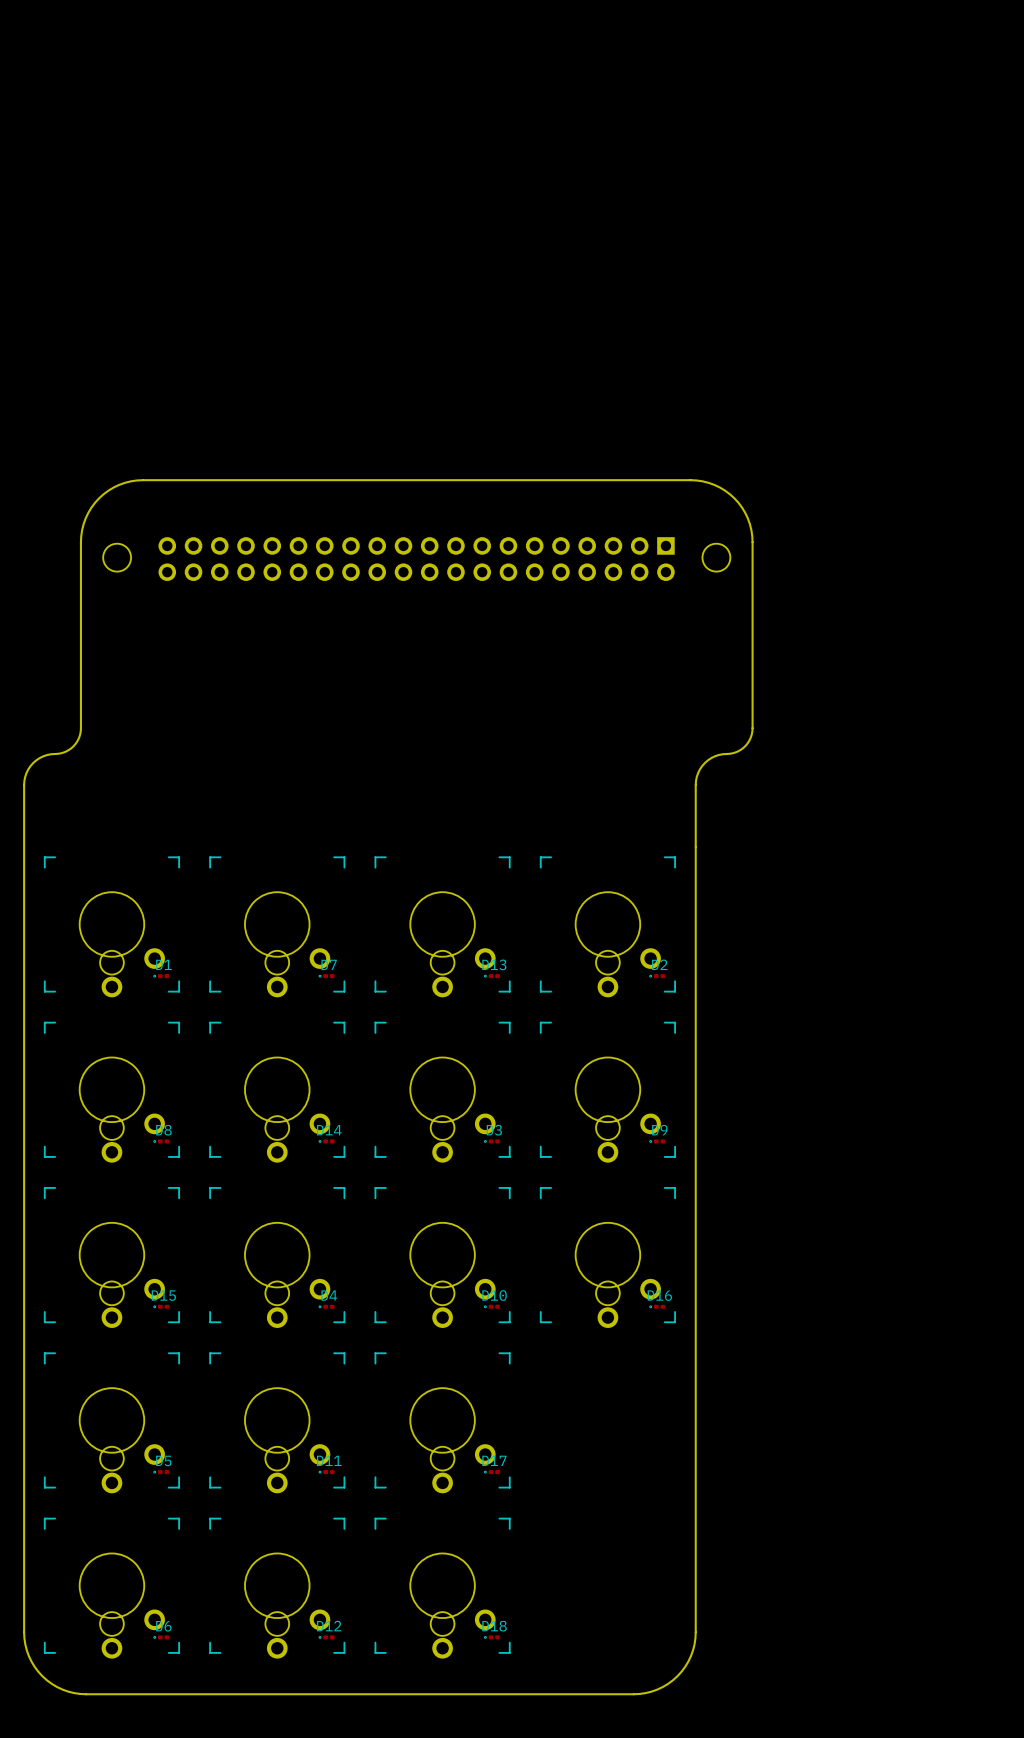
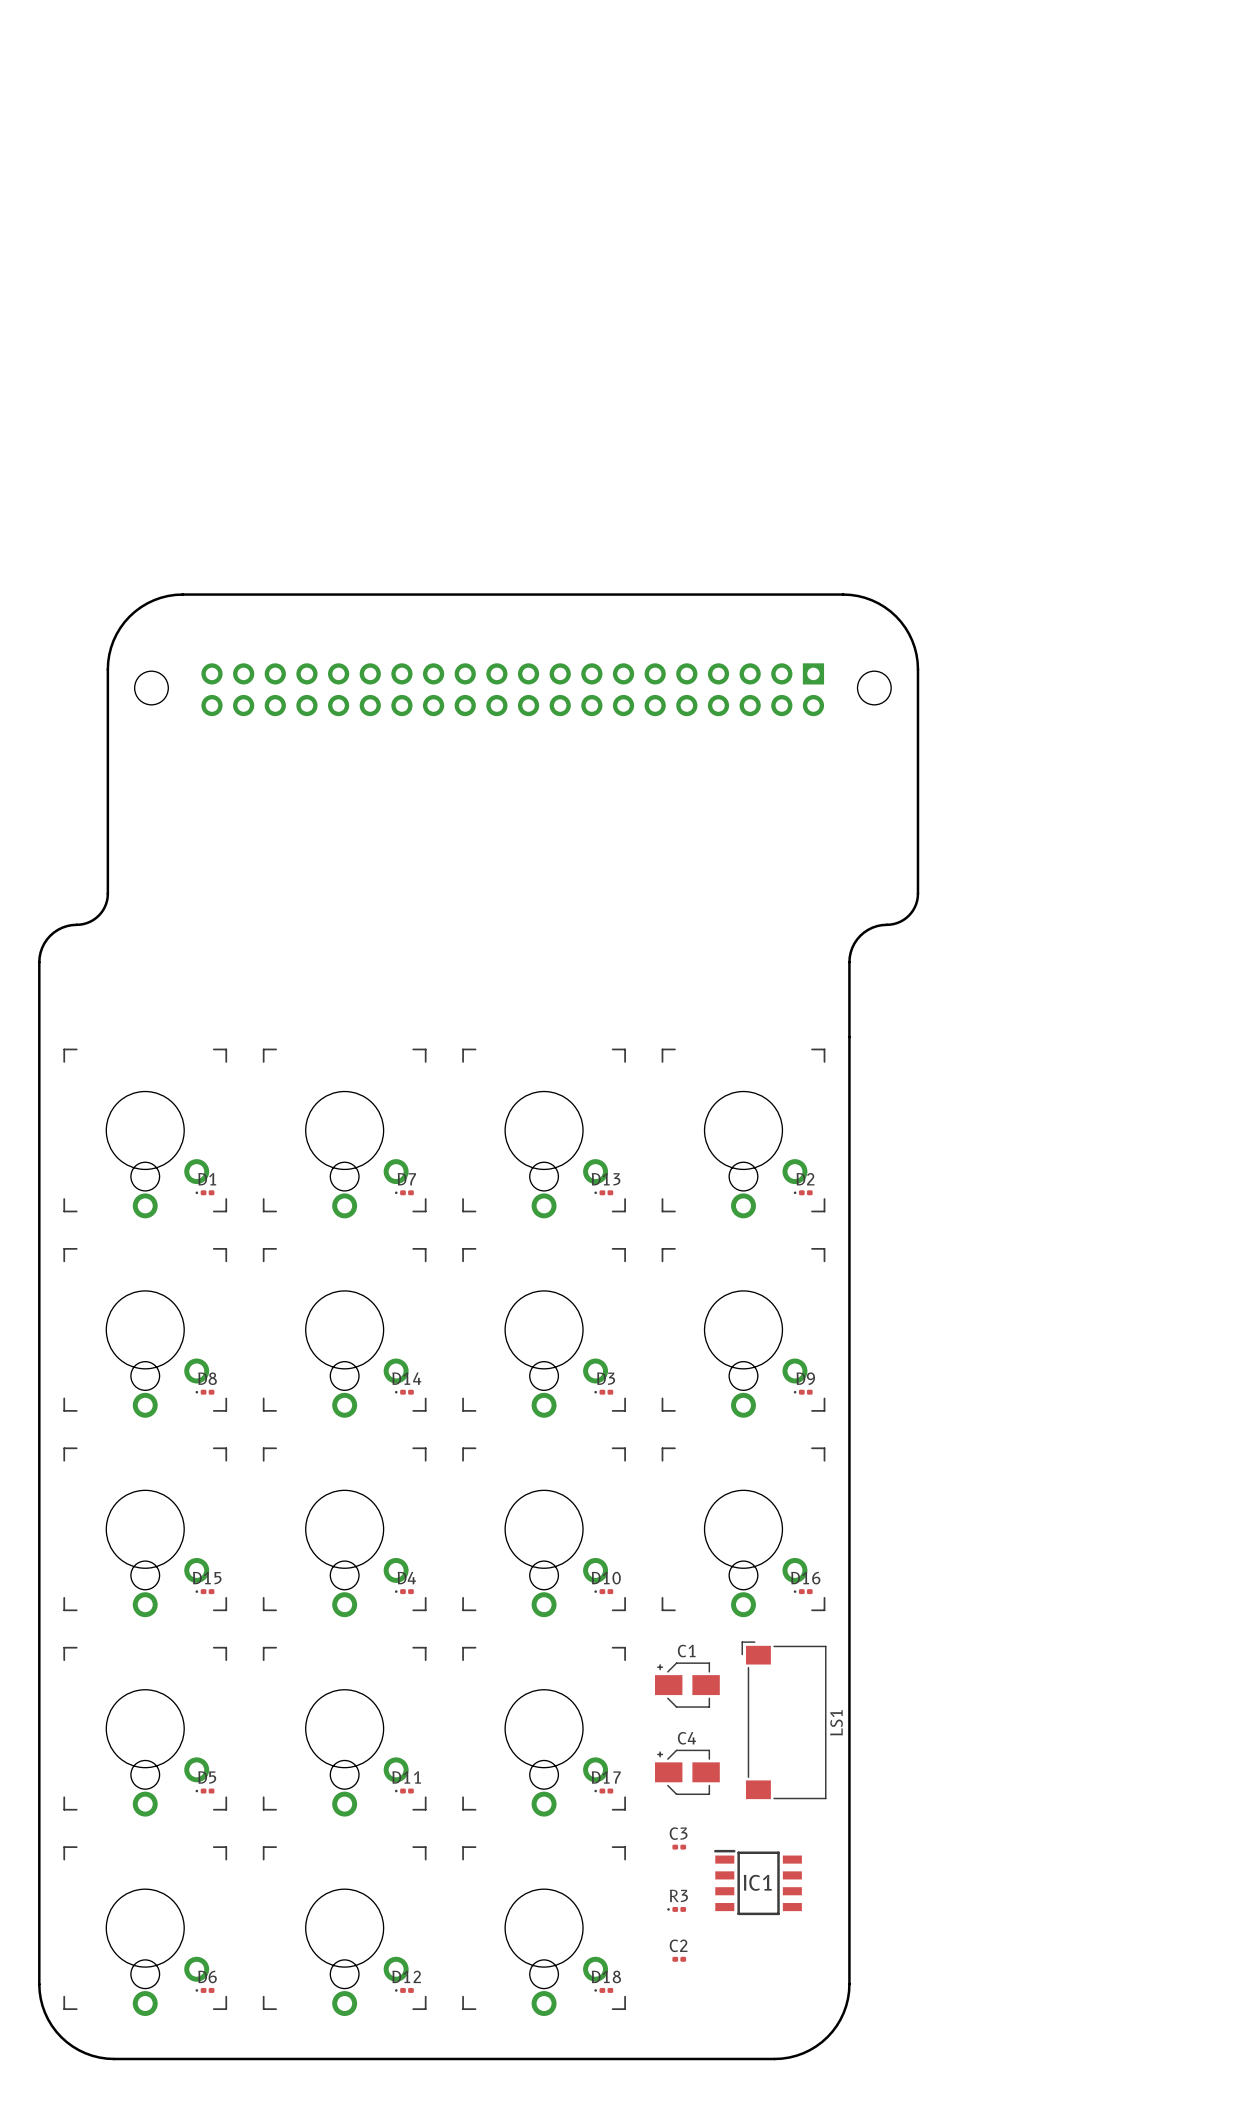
C1: none -> (687, 1685)
LS1: none -> (783, 1720)
C4: none -> (687, 1772)
C3: none -> (679, 1847)
IC1: none -> (757, 1882)
R3: none -> (676, 1909)
C2: none -> (679, 1959)

